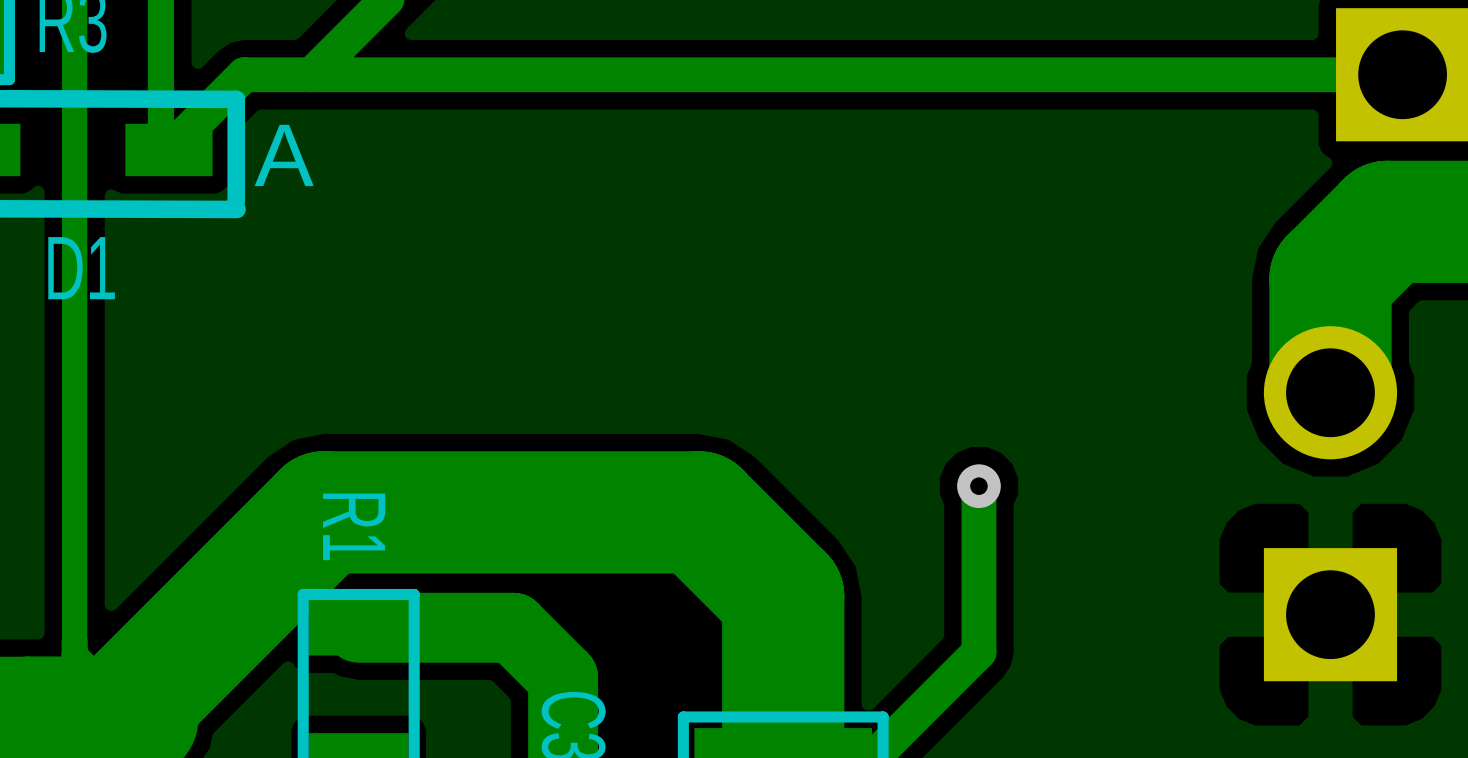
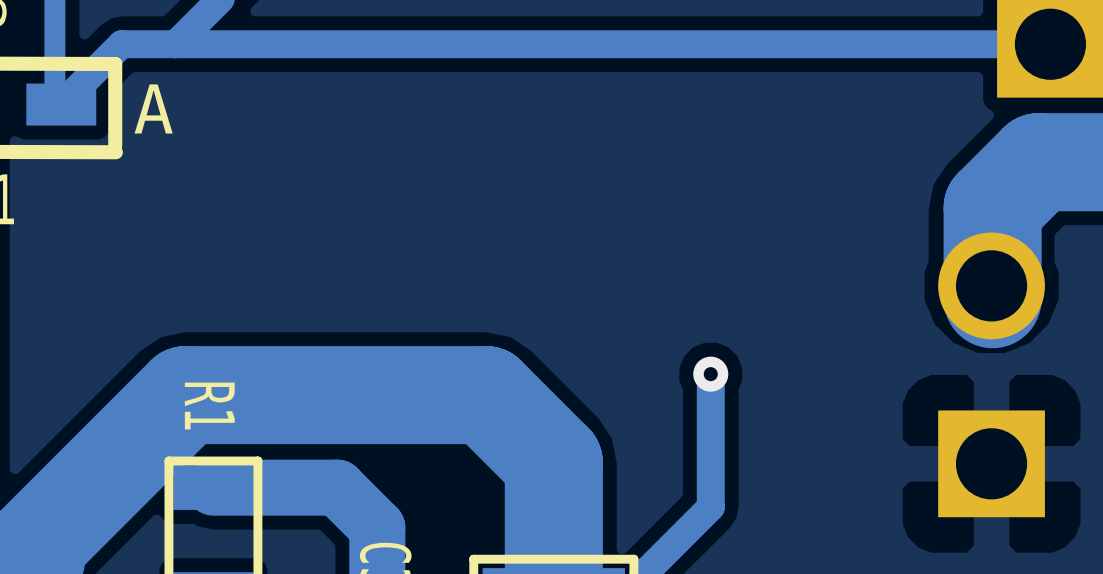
part position: (1330, 503) -> (991, 374)

